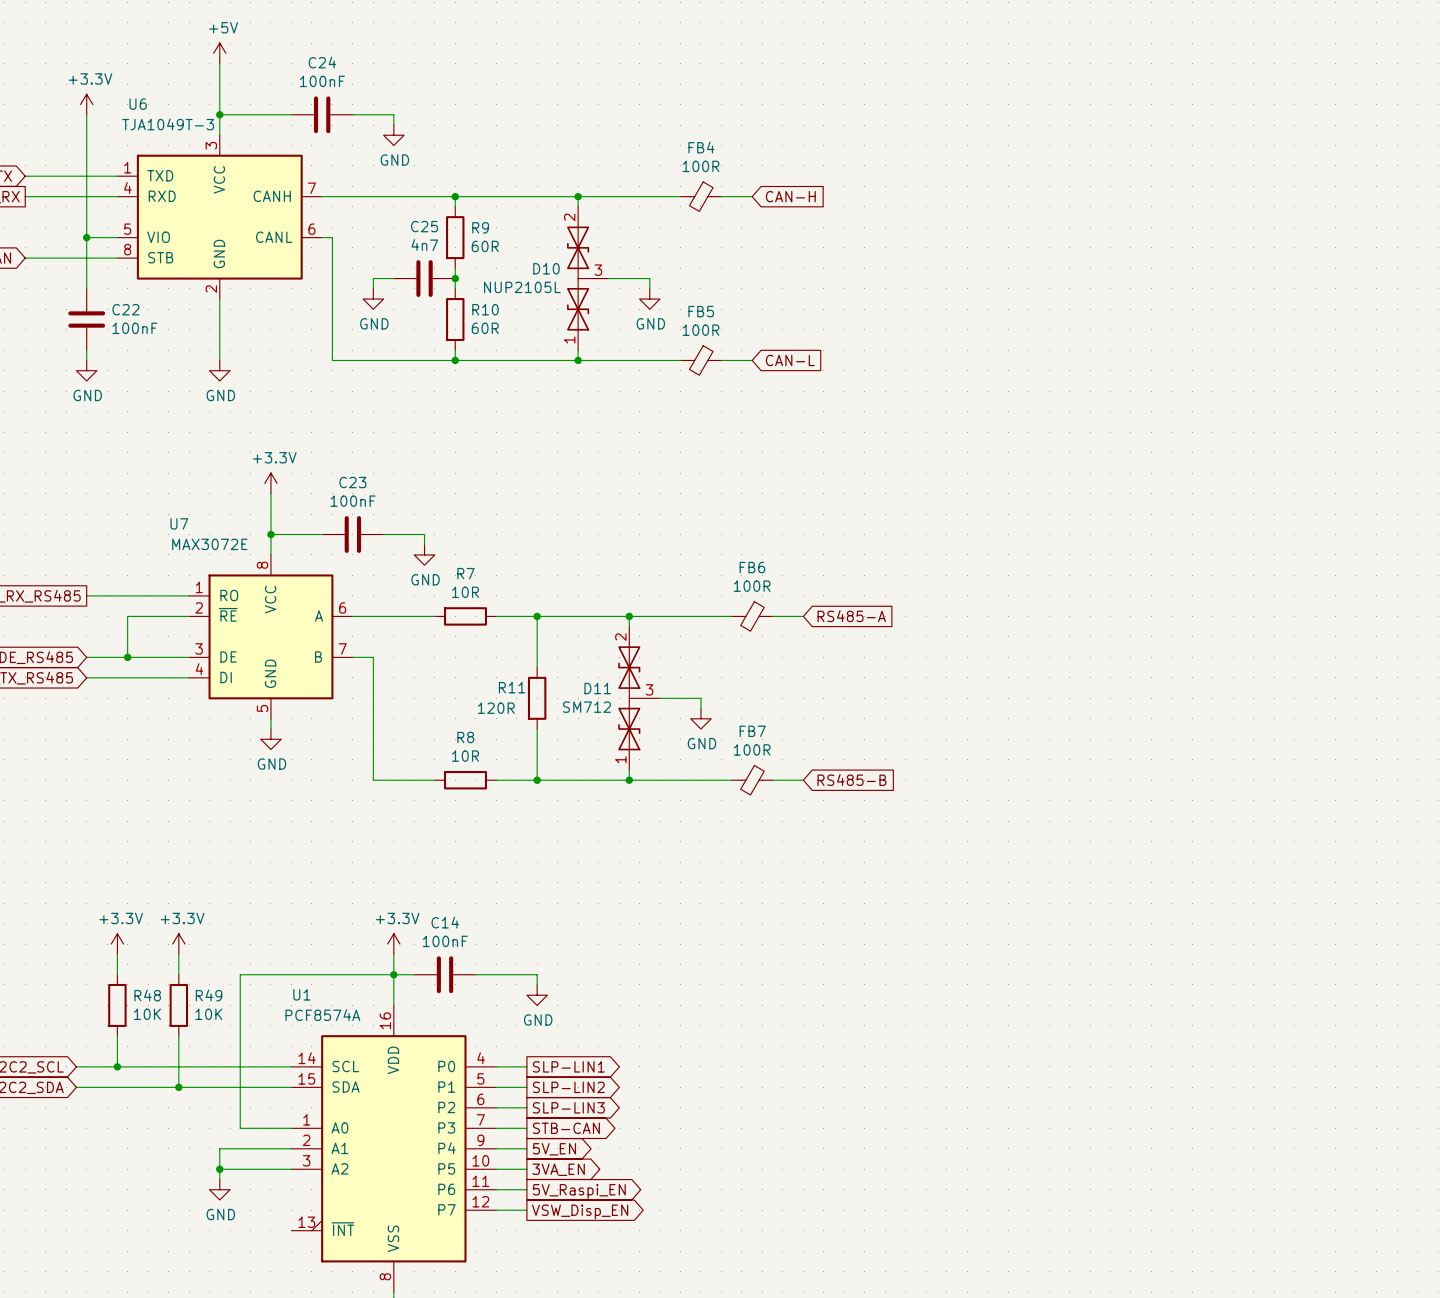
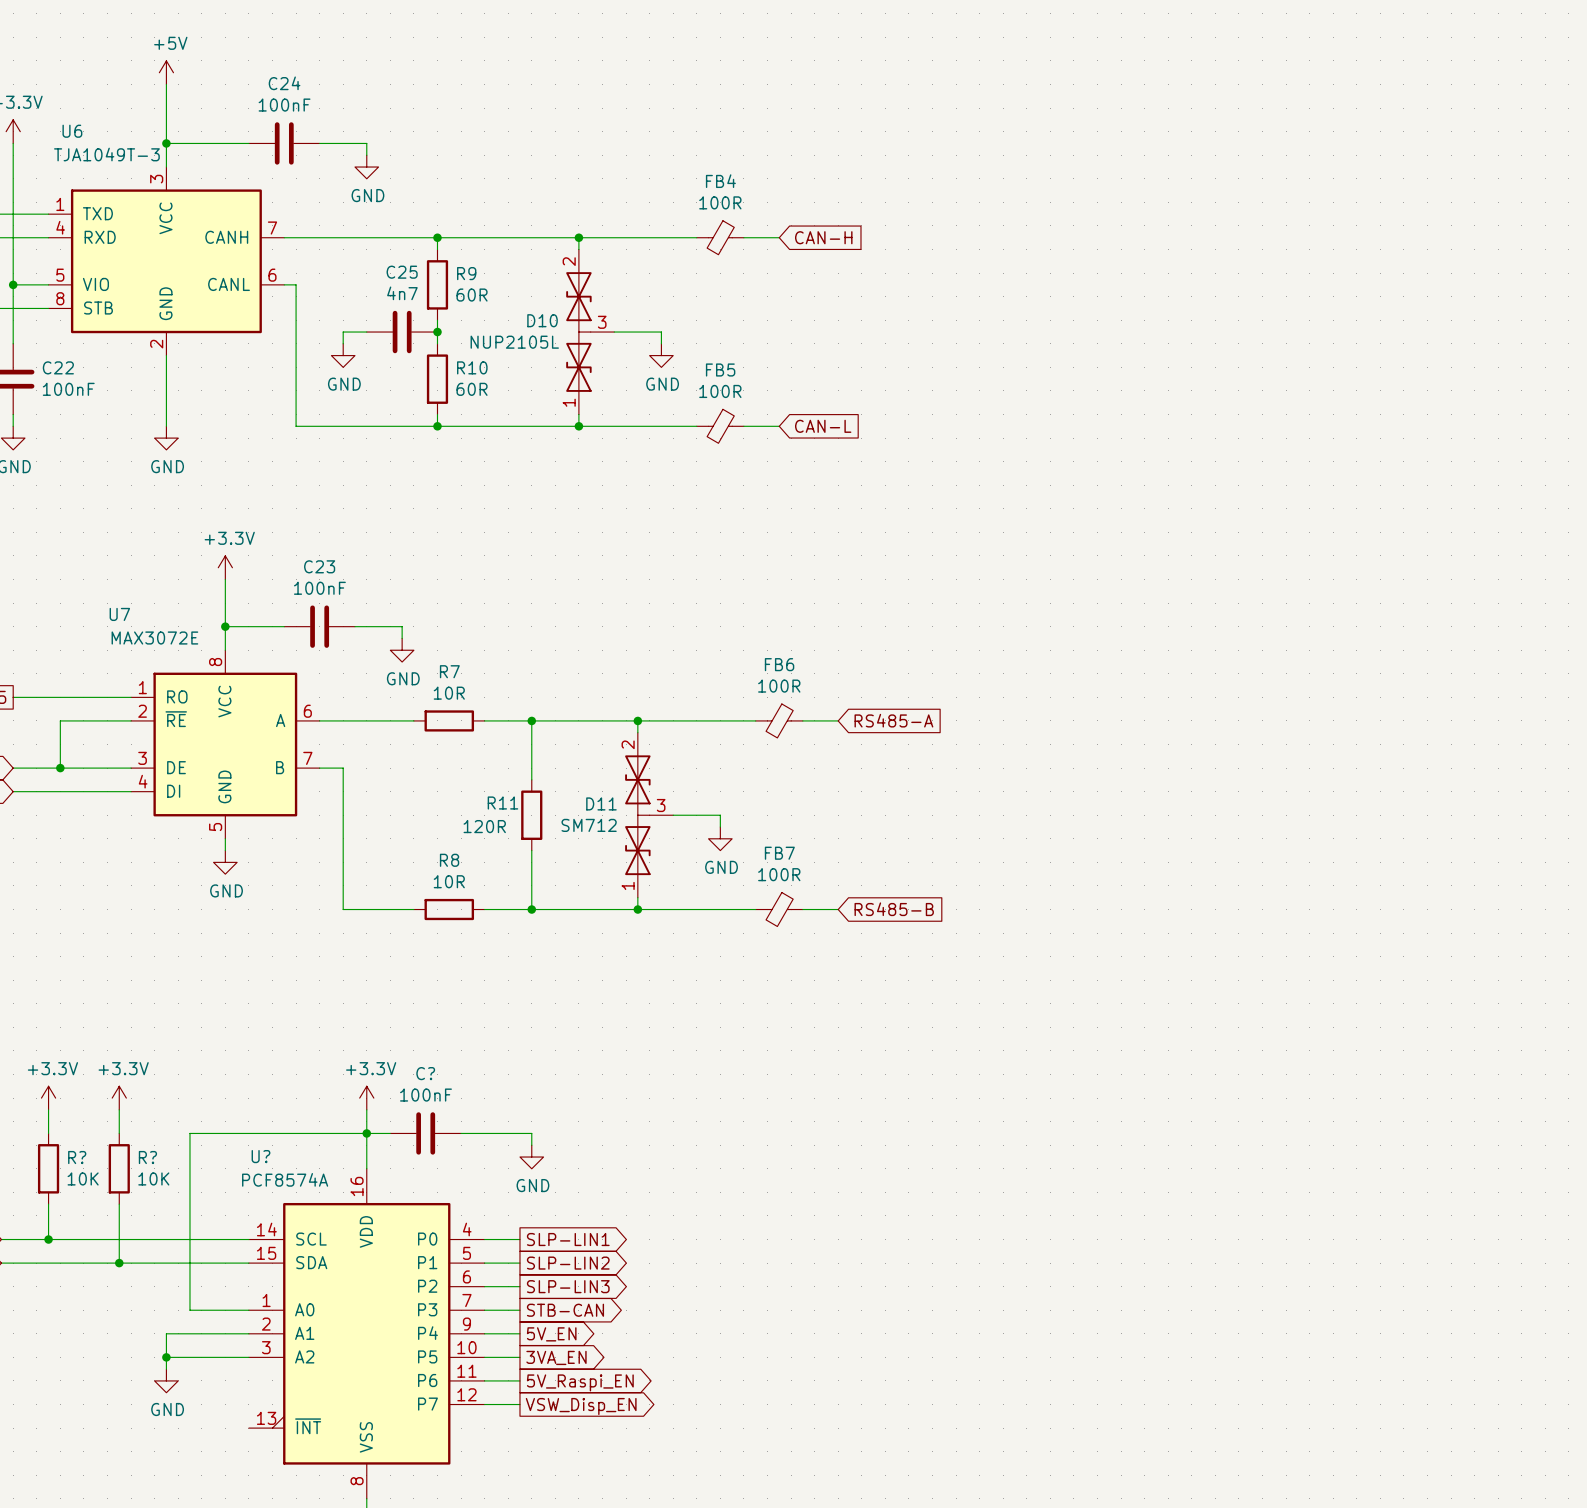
C14 name: C14 (445, 922) -> C? (425, 1073)
U1 name: U1 (301, 994) -> U? (260, 1156)
R48 name: R48 (147, 995) -> R? (77, 1157)
R49 name: R49 (209, 995) -> R? (147, 1157)

